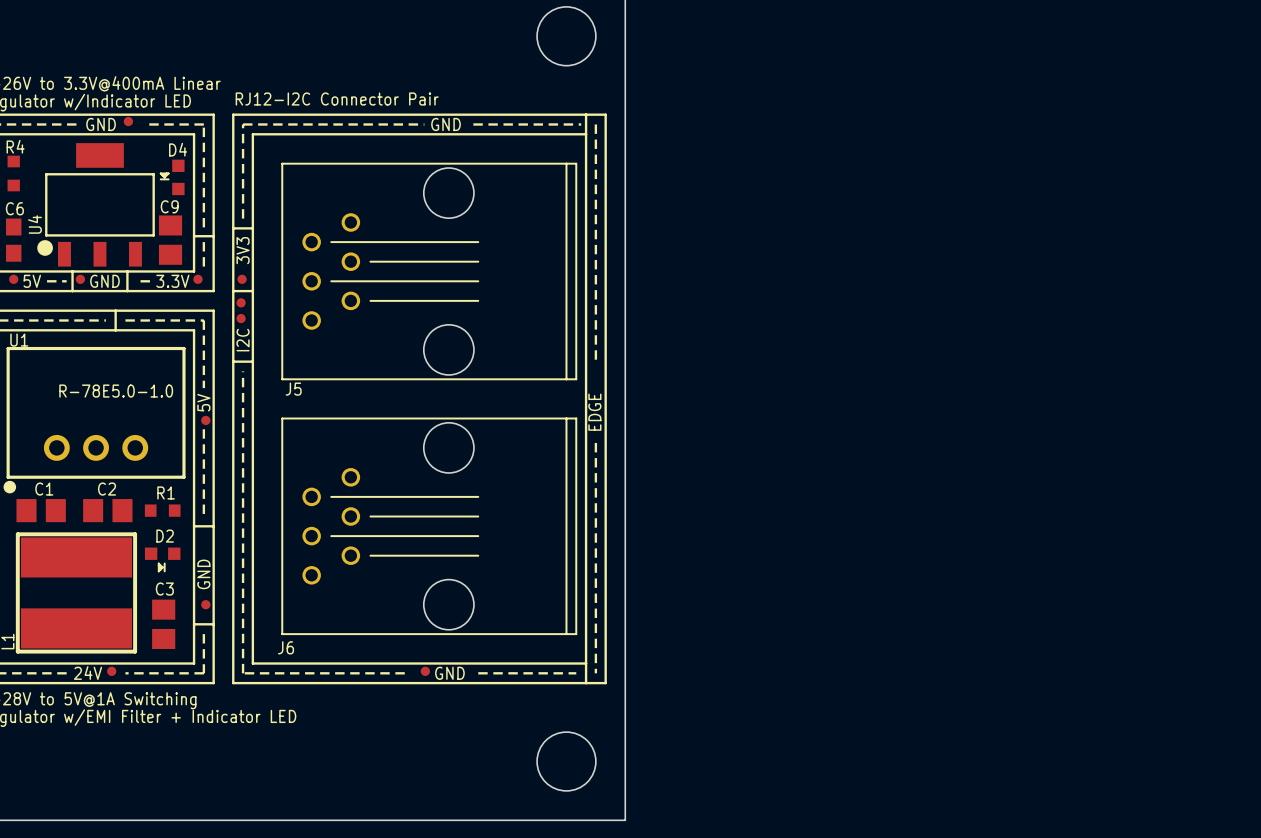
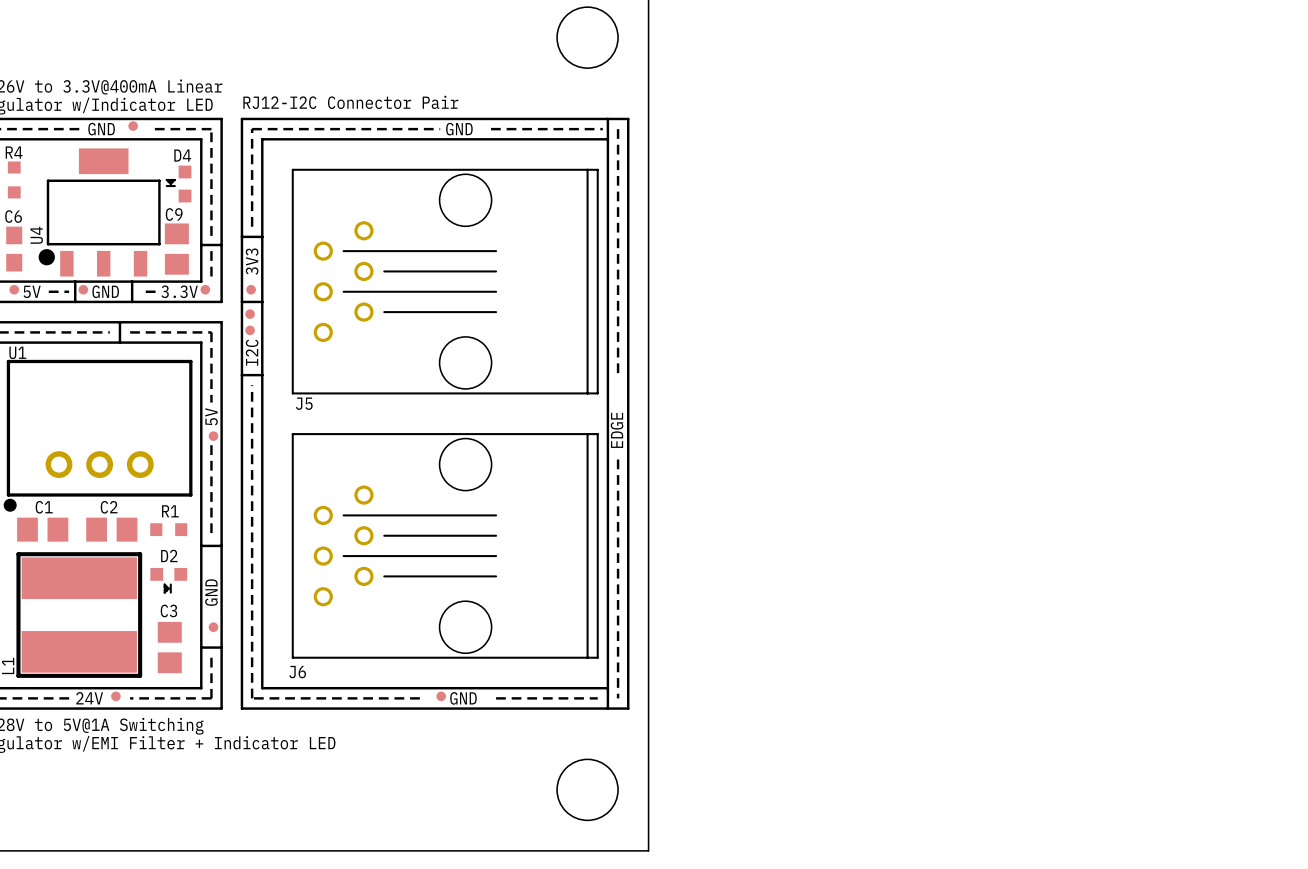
U1 value: R-78E5.0-1.0 (116, 391) -> none

